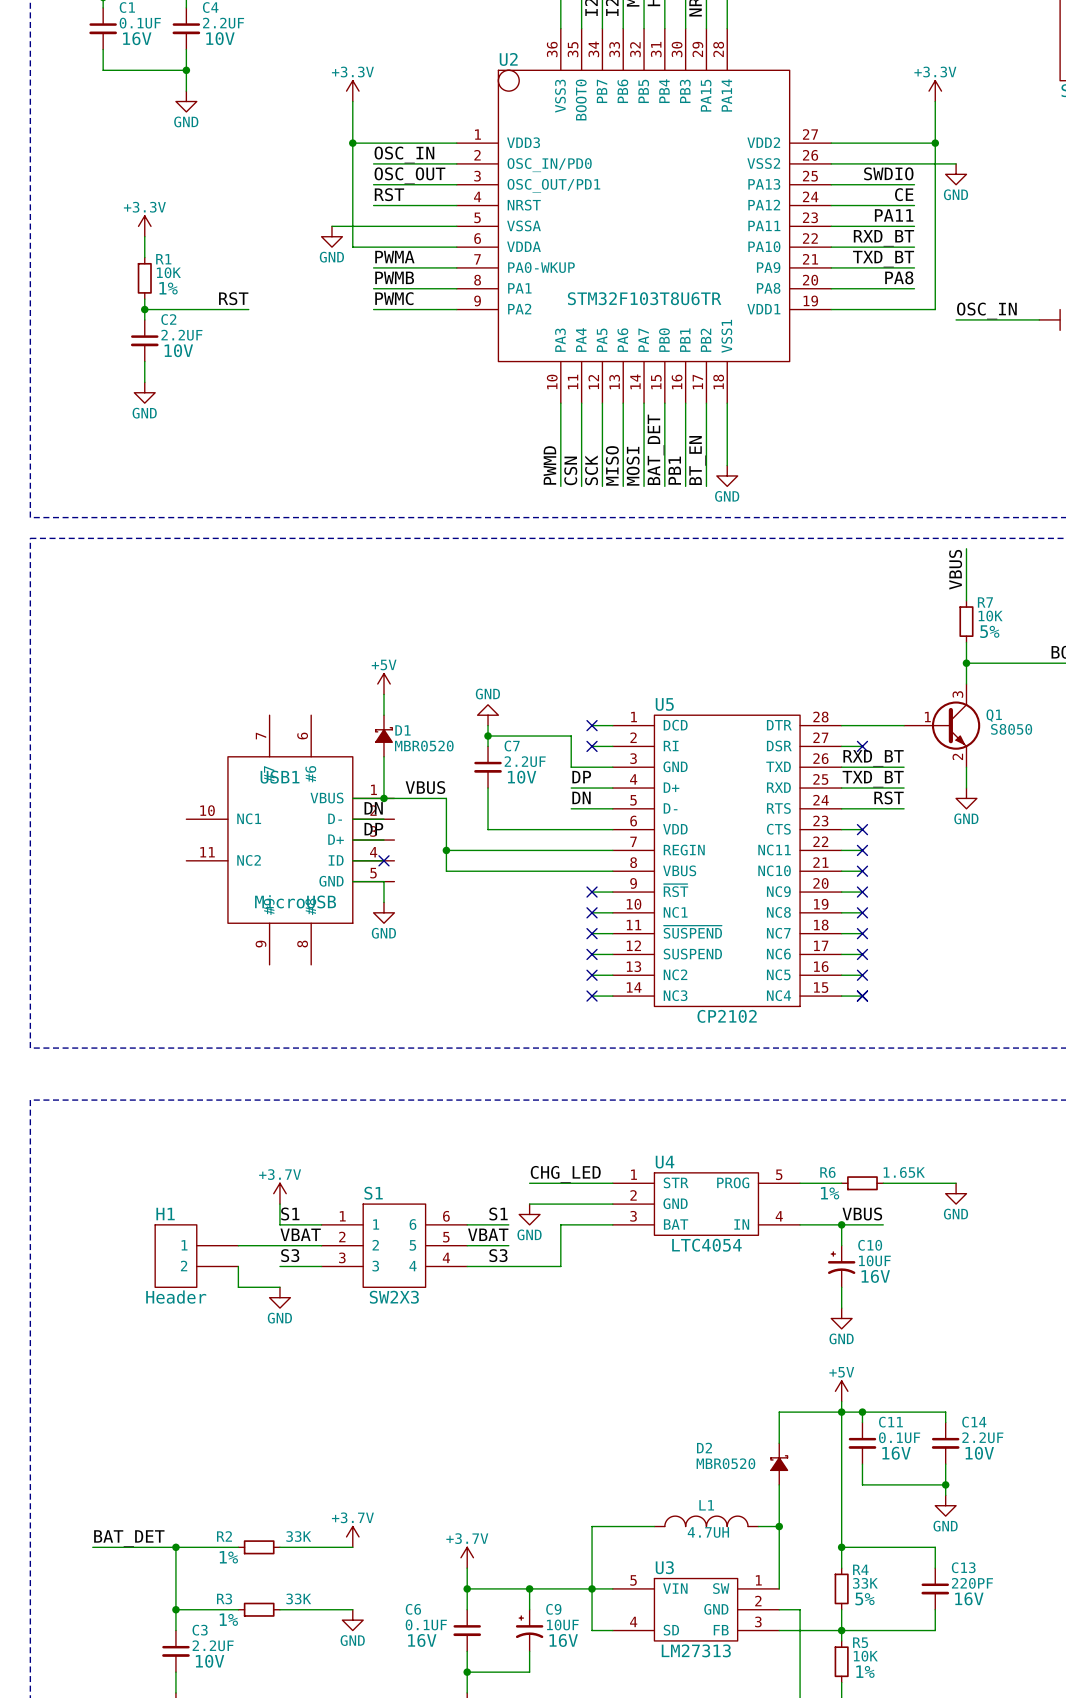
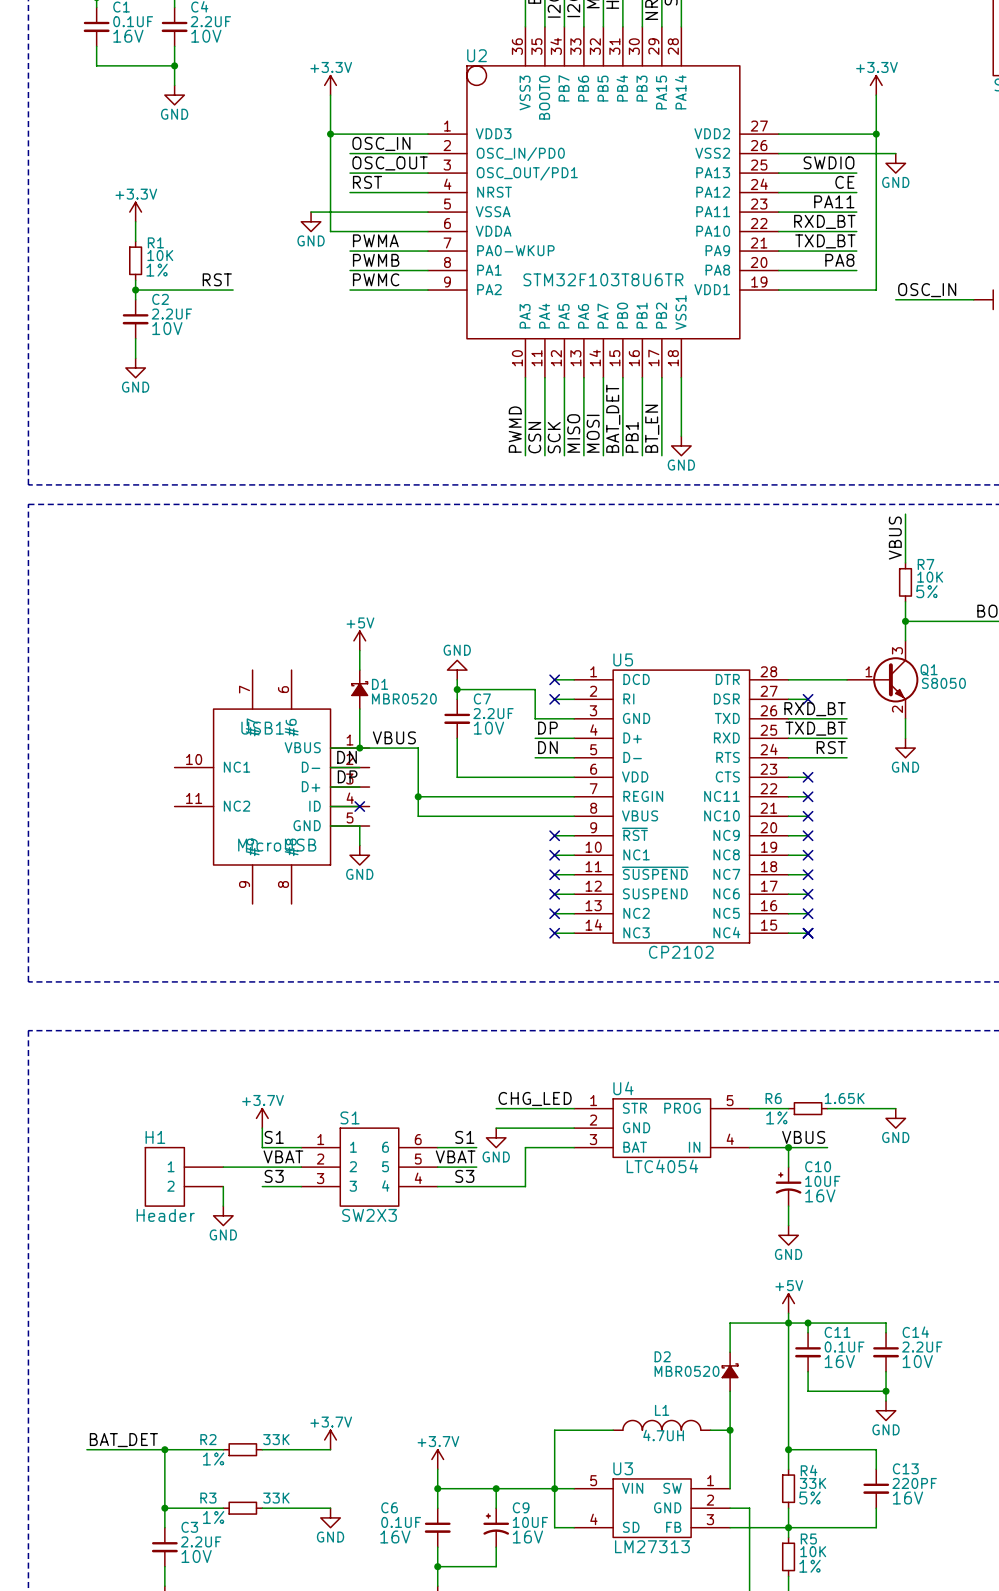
wire: (238, 1287) (279, 1287) -> none
power symbol position: GND (279, 1297) -> GND (223, 1215)

